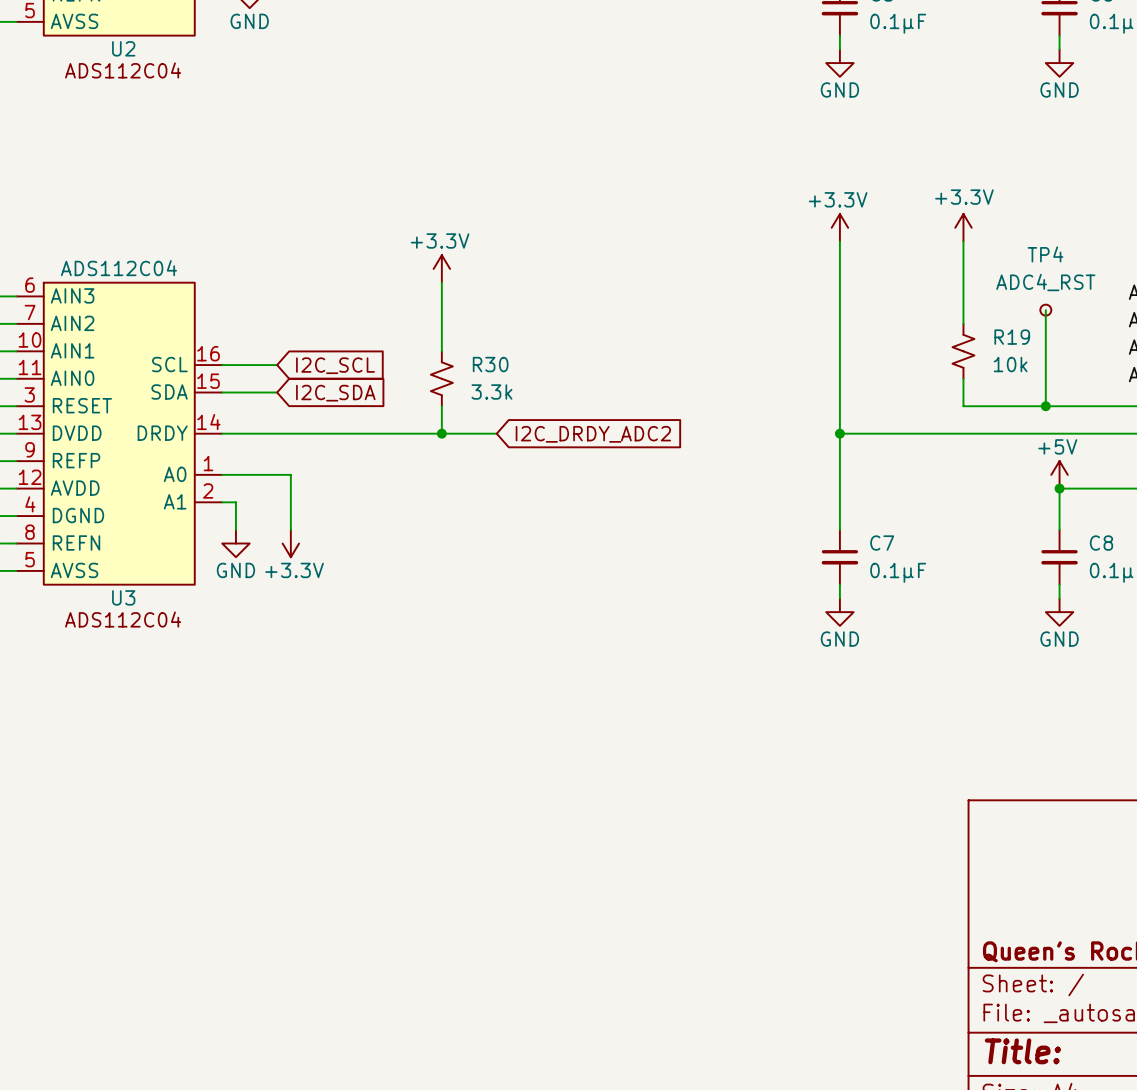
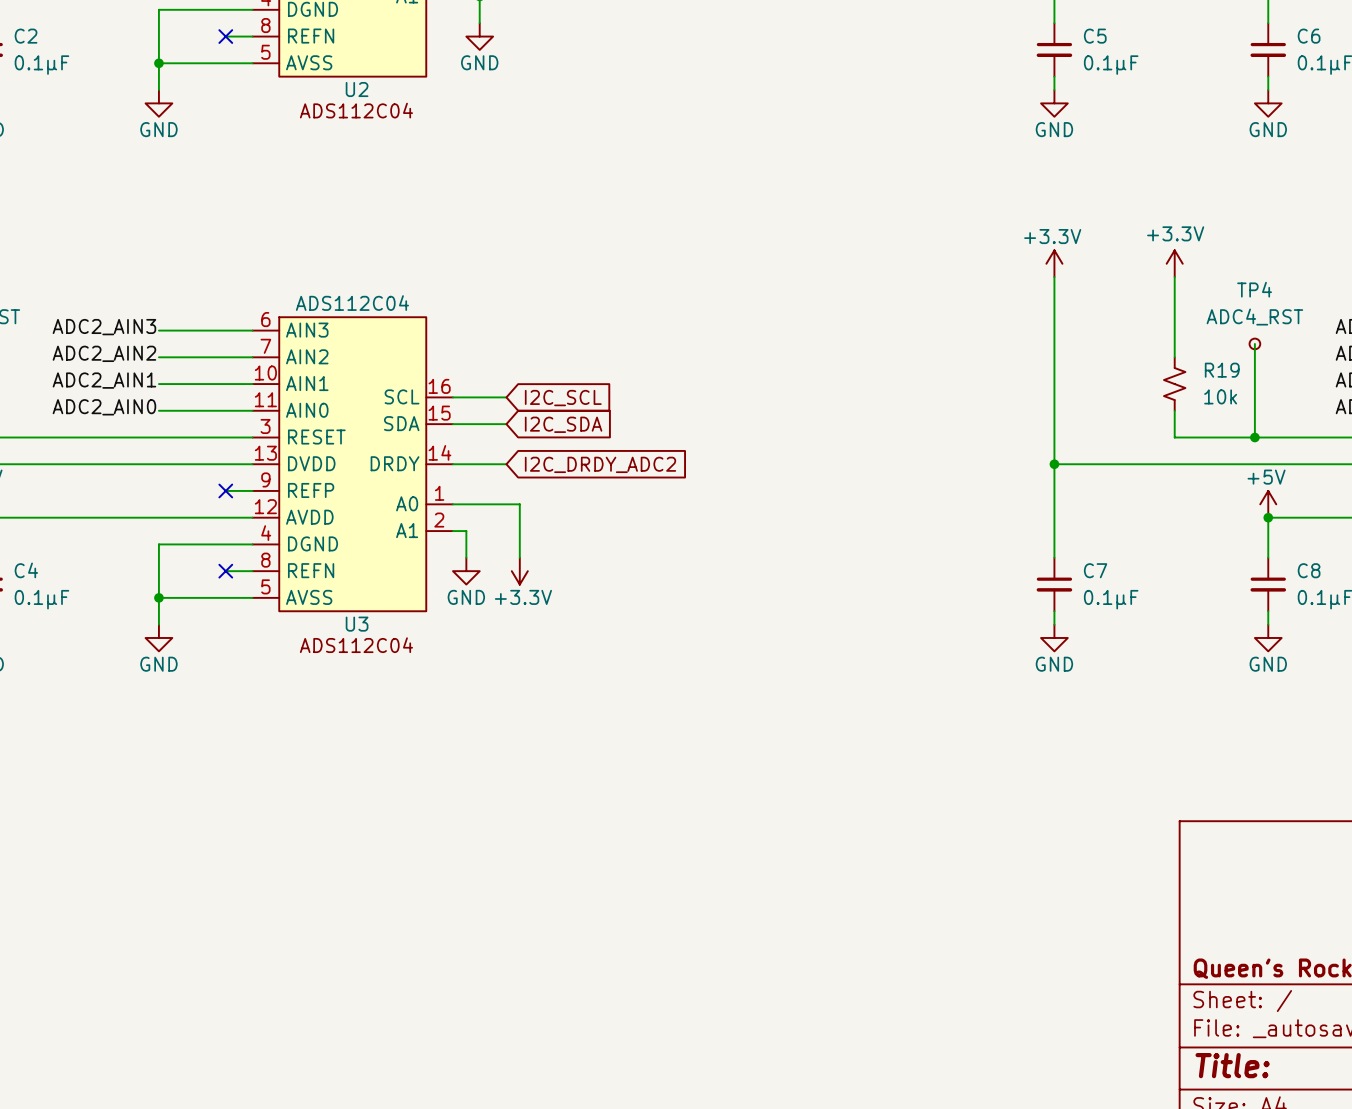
power symbol: +3.3V (441, 268) -> none
wire: (441, 282) (441, 351) -> none
R30: 3.3k (441, 378) -> none
wire: (441, 406) (441, 433) -> none
wire: (277, 433) (496, 433) -> none
junction: (441, 433) -> none
global label position: I2C_DRDY_ADC2 (593, 434) -> I2C_DRDY_ADC2 (600, 464)

